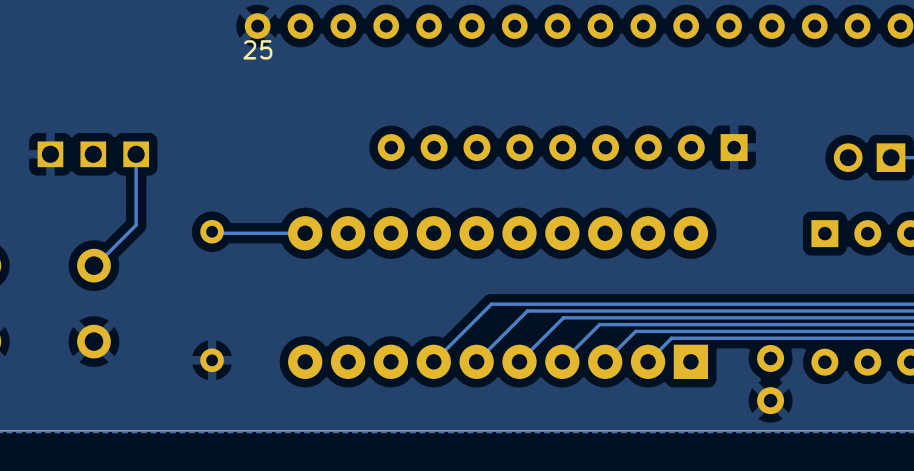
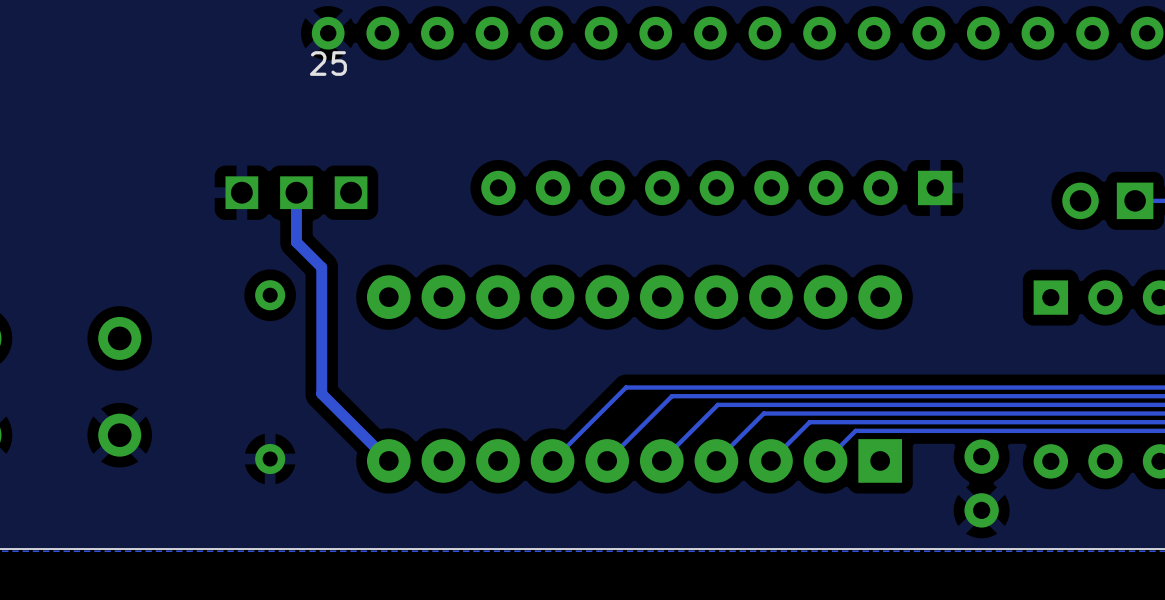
track: none -> (296, 192) (296, 242) (321, 267) (321, 393) (388, 460)
part position: (93, 154) -> (296, 192)
track: (136, 154) (136, 225) (93, 265) -> none
track: (305, 233) (213, 233) -> none

